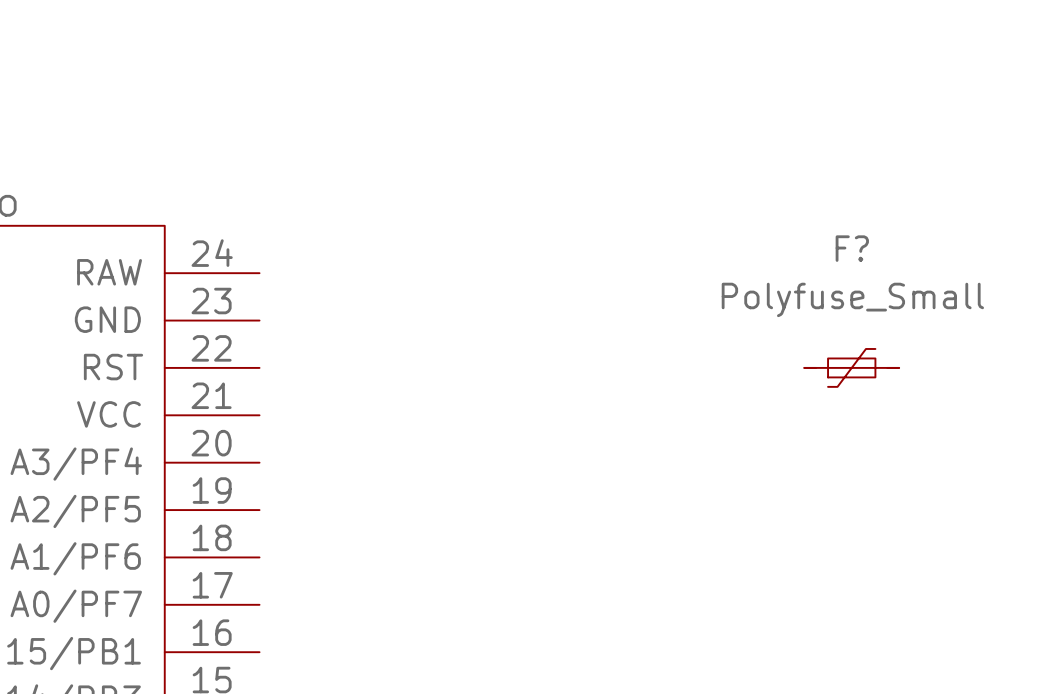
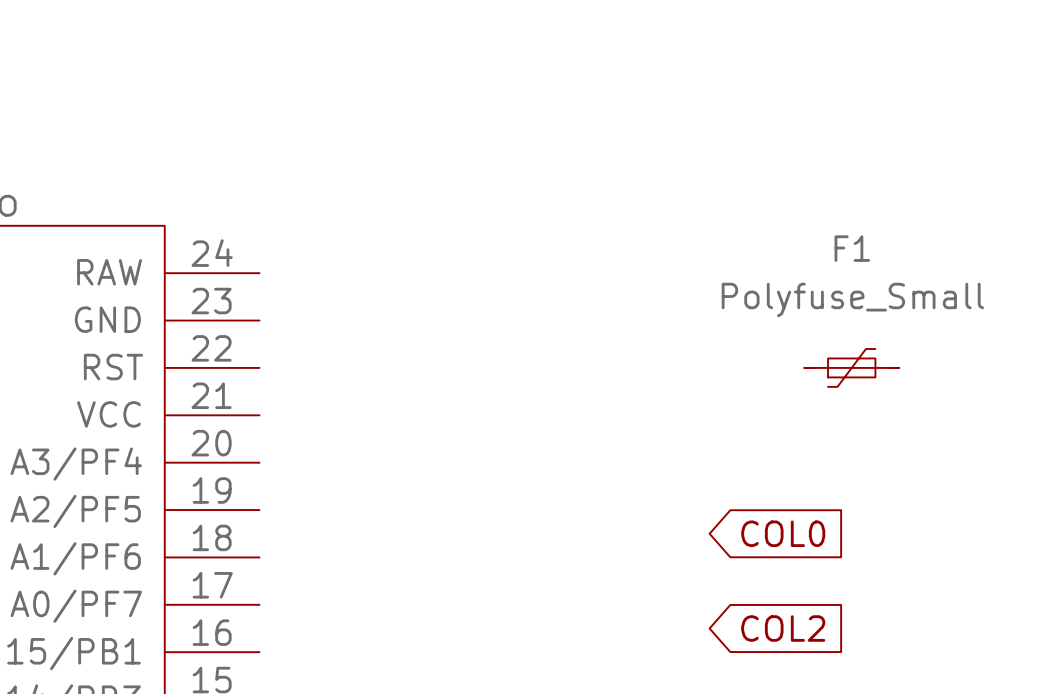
F? name: F? (852, 248) -> F1 (852, 248)
global label: none -> COL0 (783, 533)
global label: none -> COL2 (783, 628)

